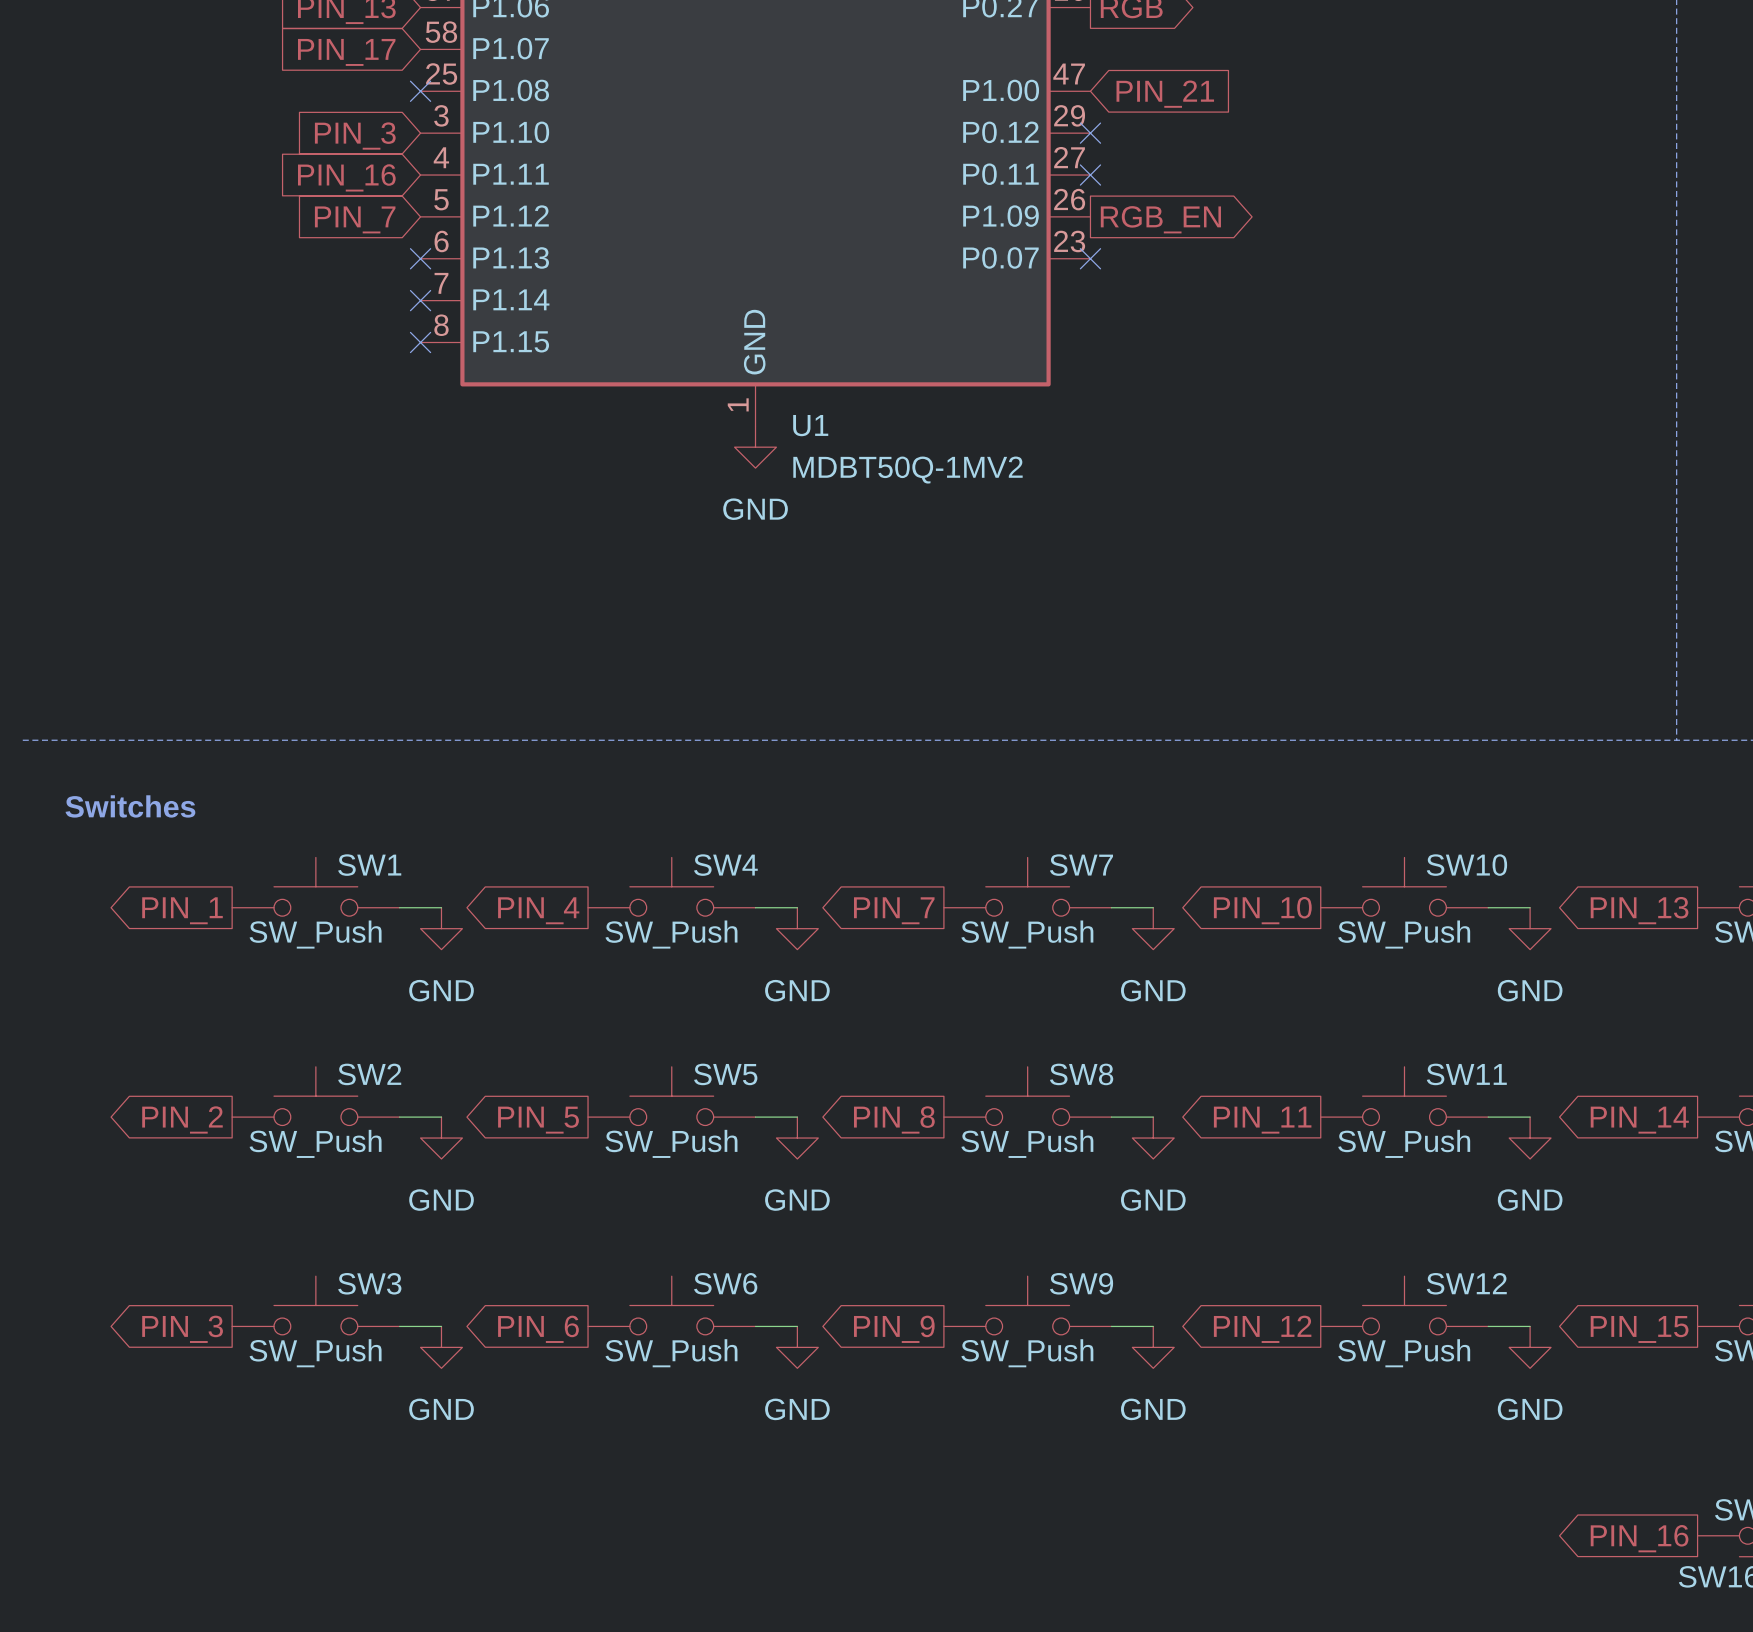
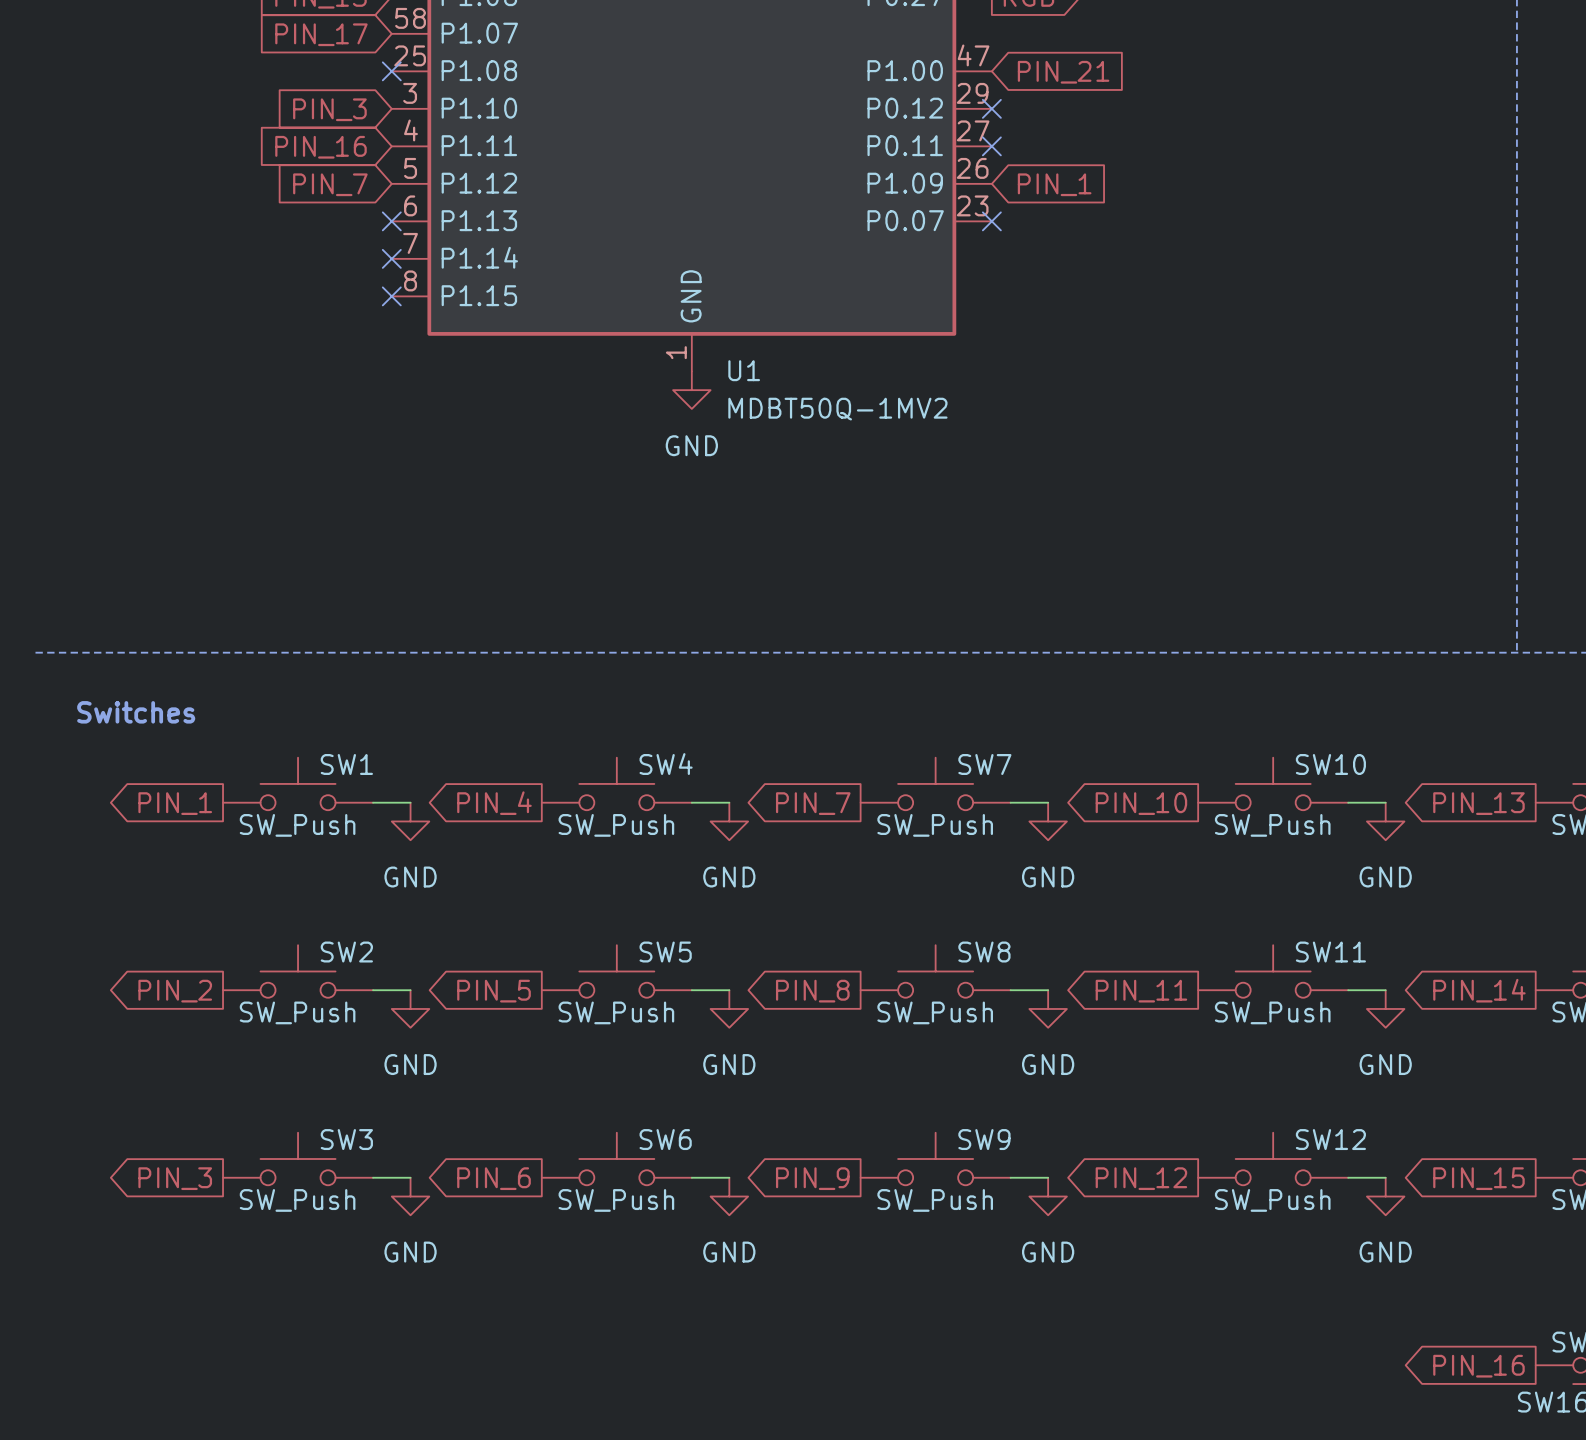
global label shape: output (1160, 219) -> input (1054, 184)
global label: RGB_EN (1160, 219) -> PIN_1 (1054, 184)

